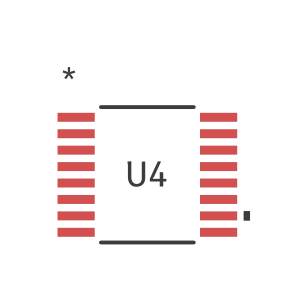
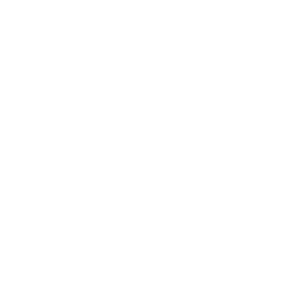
U4: (153, 174) -> none

